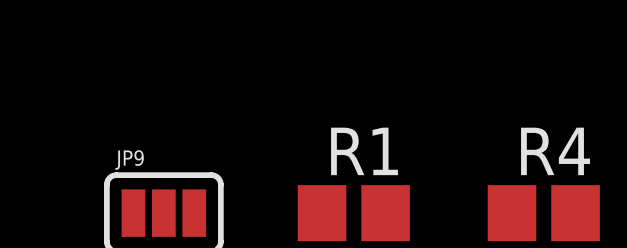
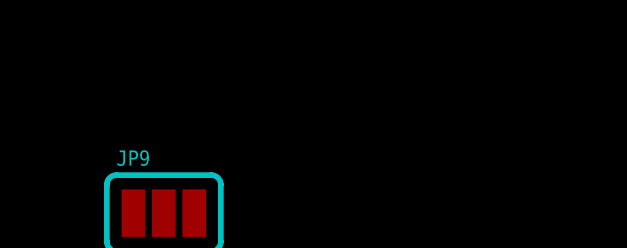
R1: (353, 213) -> none
R4: (543, 213) -> none

